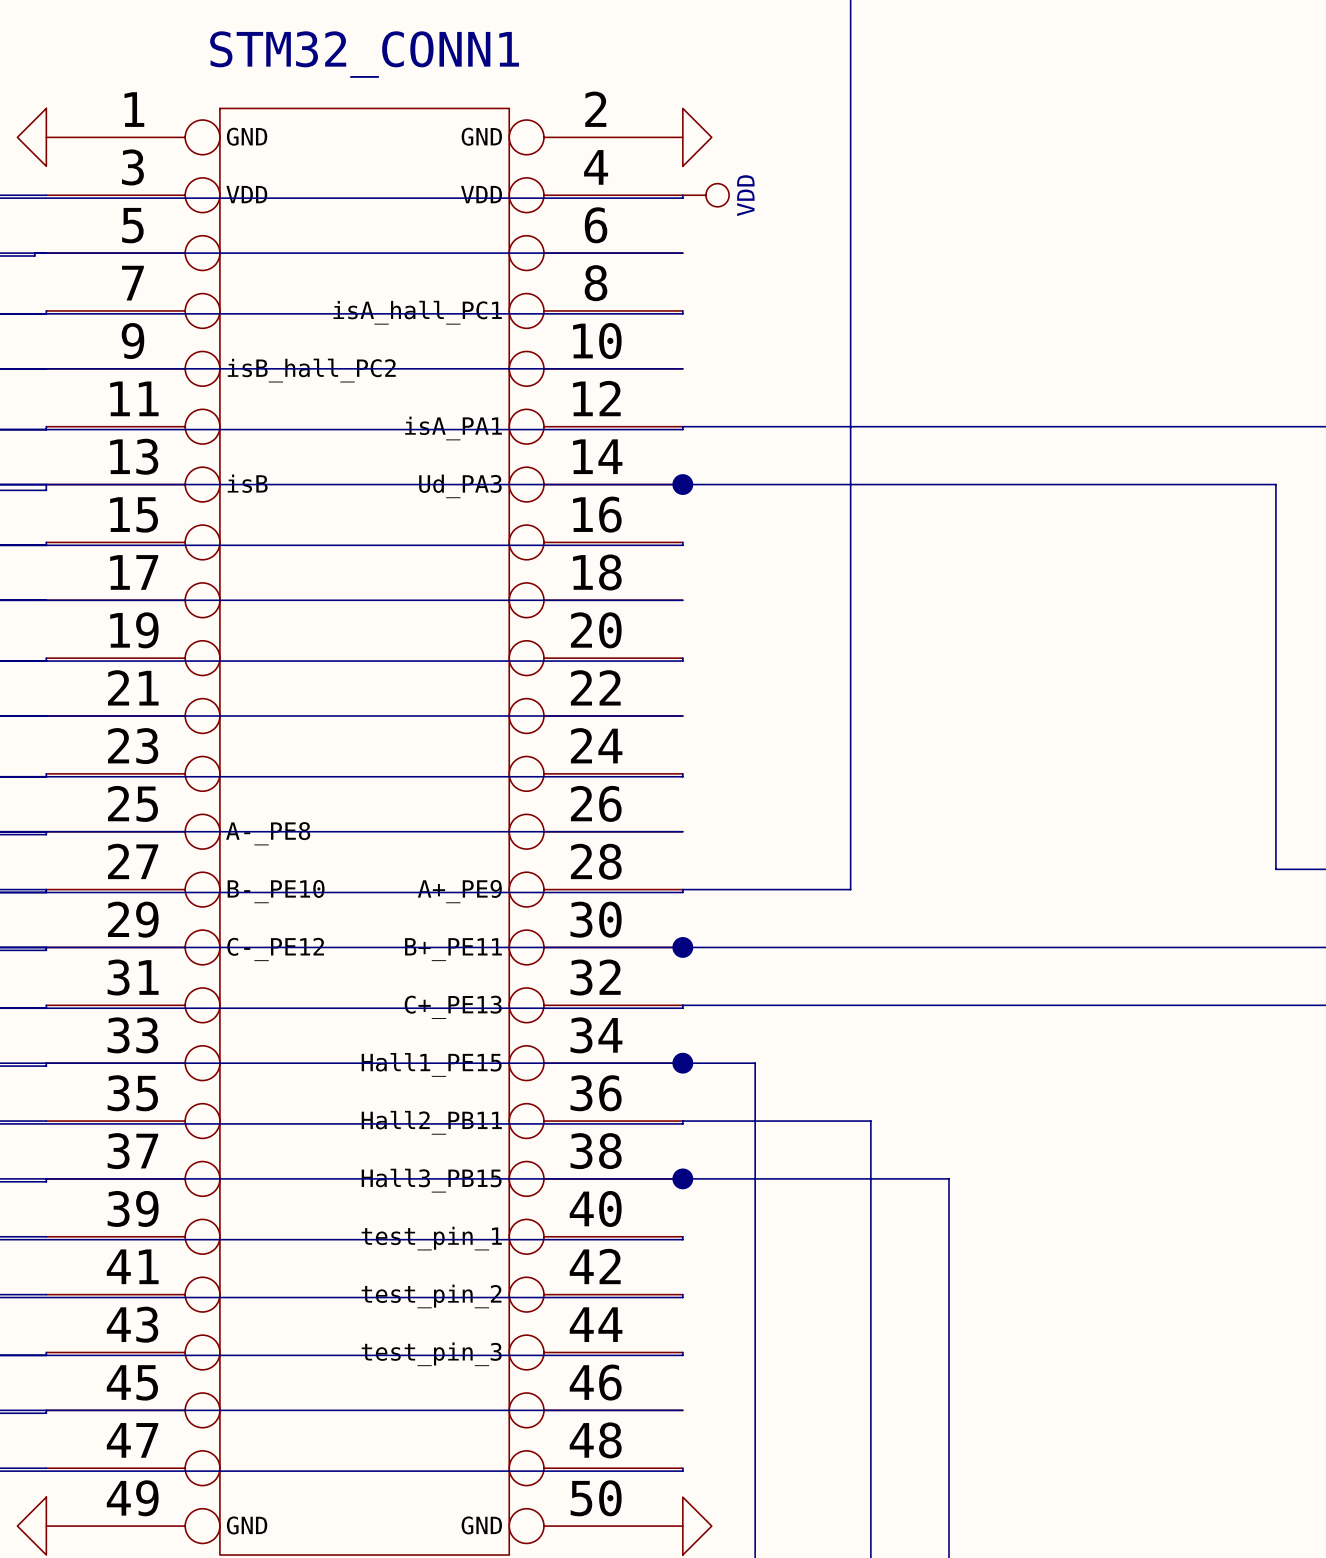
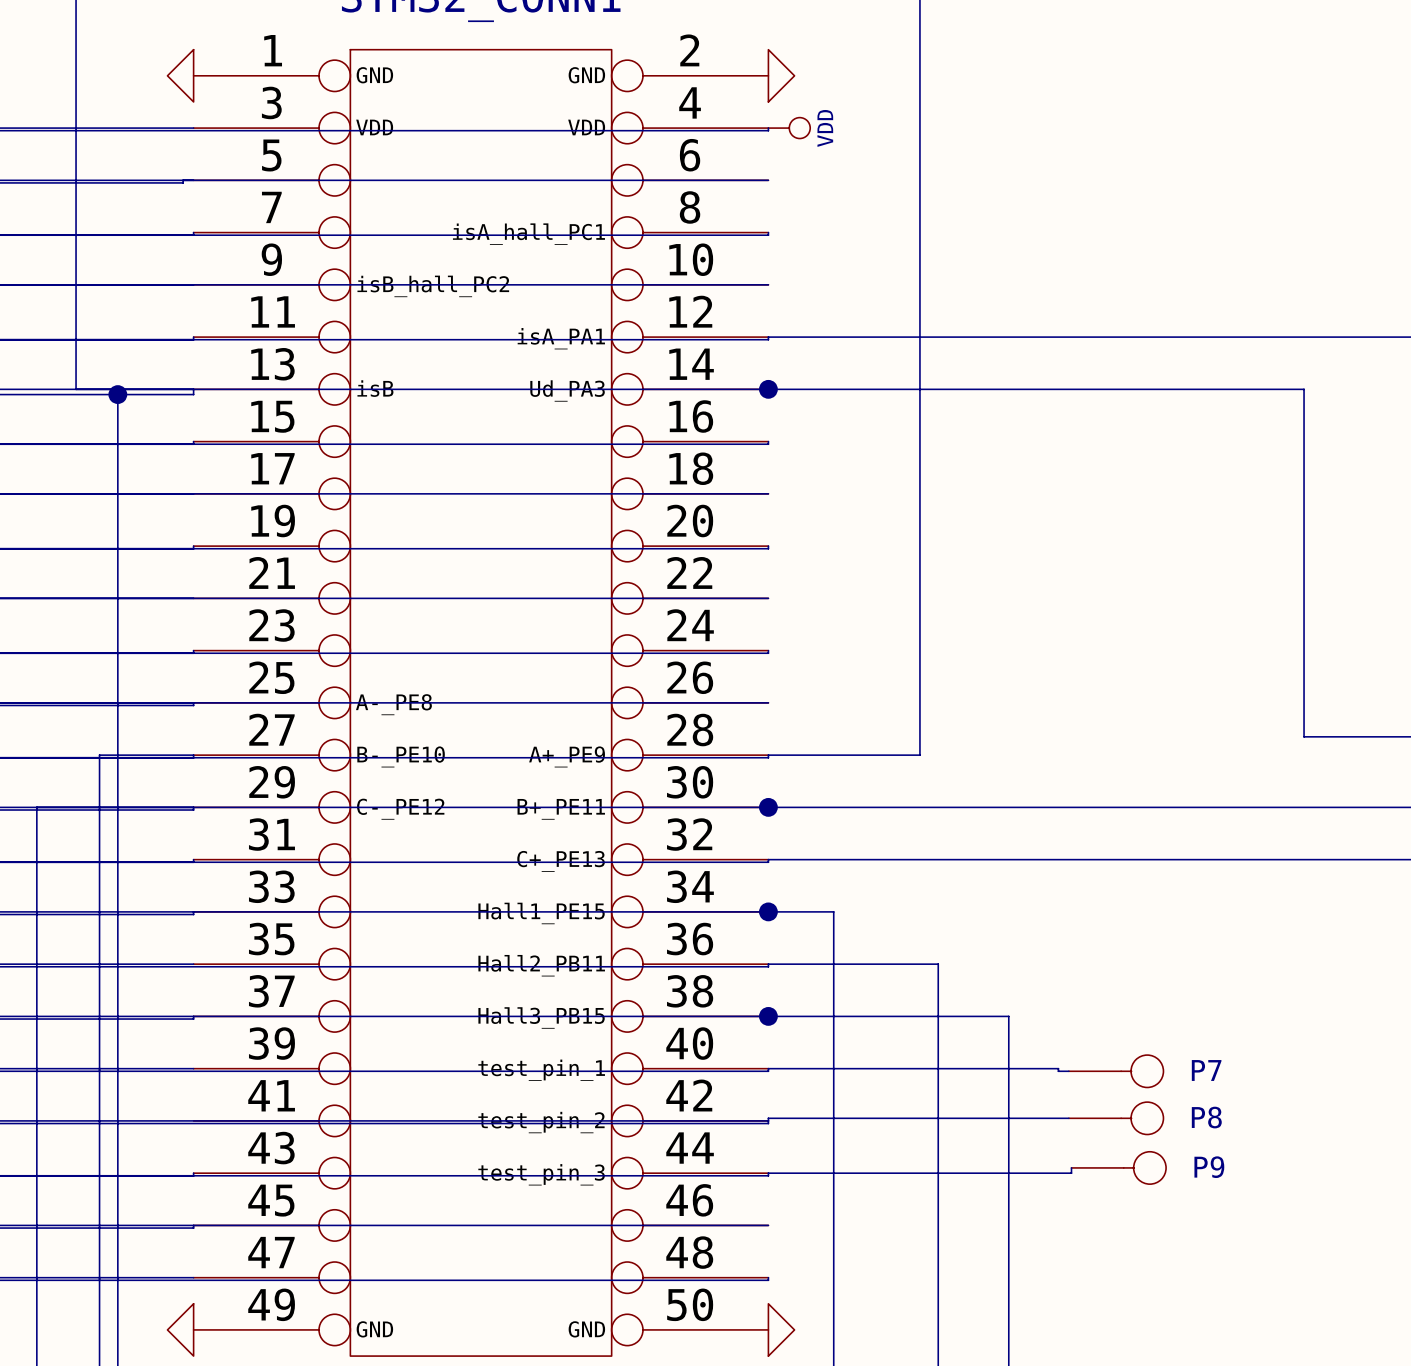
wire: none -> (768, 1068) (1058, 1068) (1058, 1071) (1068, 1071)
P7: none -> (1116, 1071)
wire: none -> (1068, 1118) (768, 1118) (768, 1120) (193, 1120)
P8: none -> (1116, 1118)
wire: none -> (1071, 1167) (1071, 1173) (768, 1173)
P9: none -> (1118, 1167)

